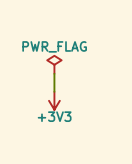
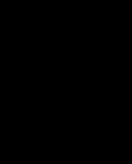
power symbol: PWR_FLAG (54, 64) -> none
wire: (54, 73) (54, 91) -> none
power symbol: +3V3 (54, 100) -> none

